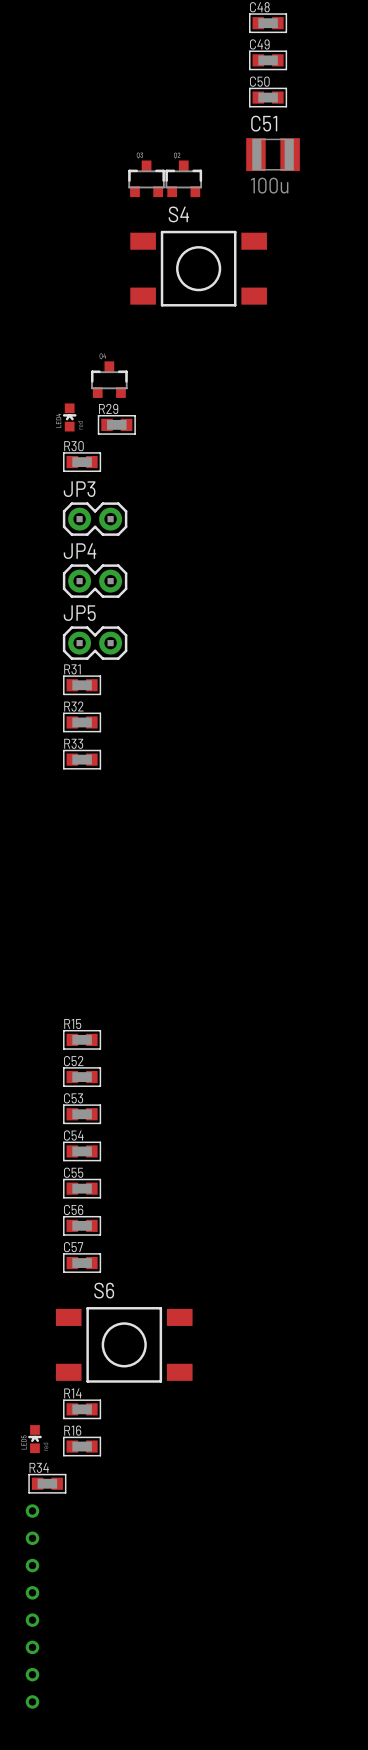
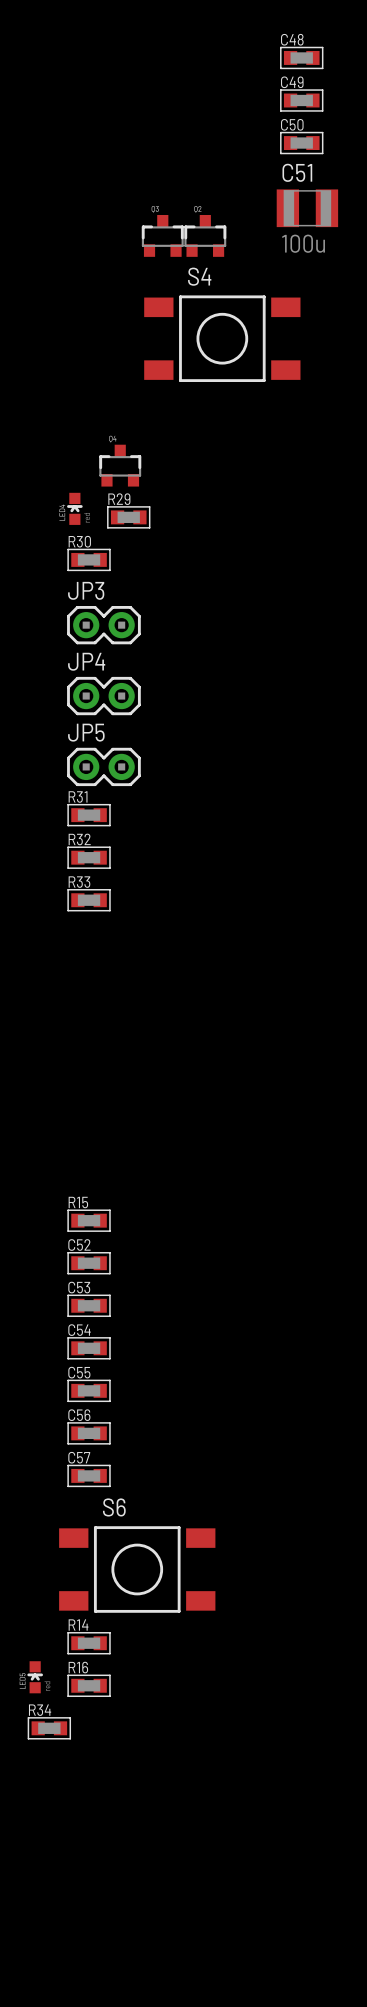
part: (32, 1511) -> none
part: (32, 1538) -> none
part: (32, 1565) -> none
part: (32, 1592) -> none
part: (32, 1620) -> none
part: (32, 1647) -> none
part: (32, 1674) -> none
part: (32, 1701) -> none

